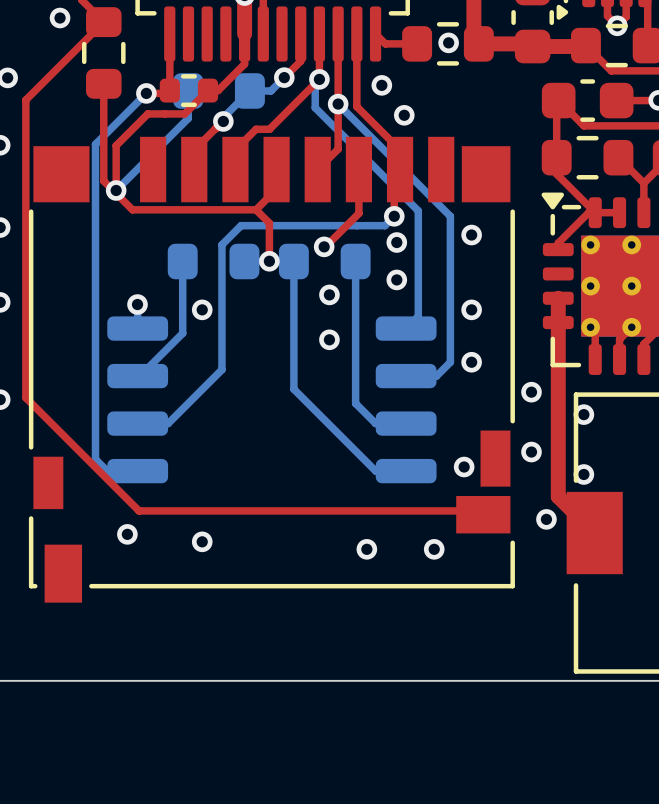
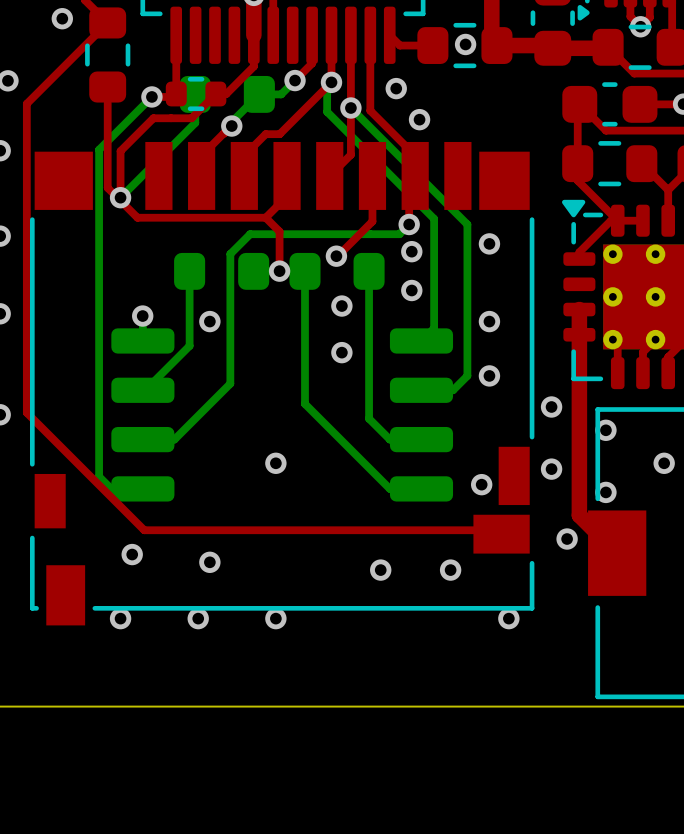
via: none -> (275, 463)
via: none -> (664, 463)
via: none -> (120, 618)
via: none -> (198, 618)
via: none -> (275, 618)
via: none -> (508, 618)

